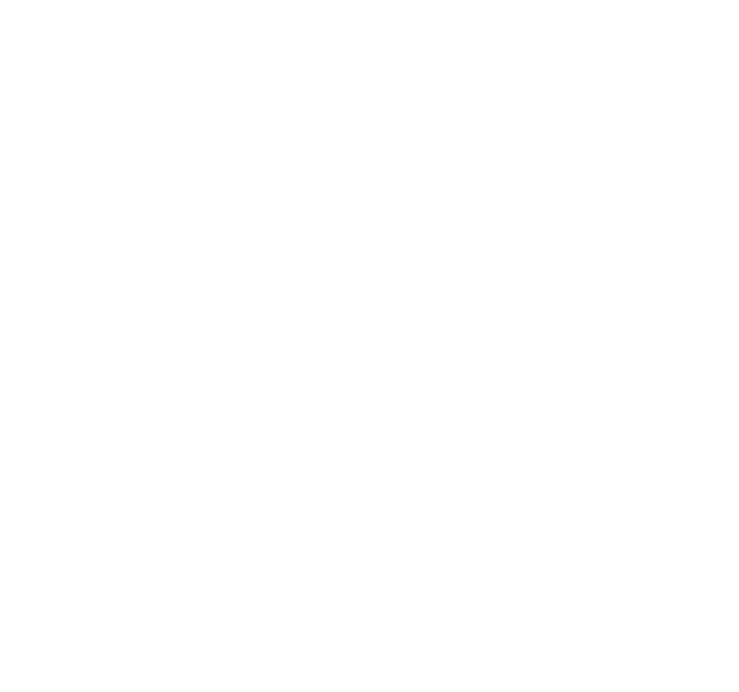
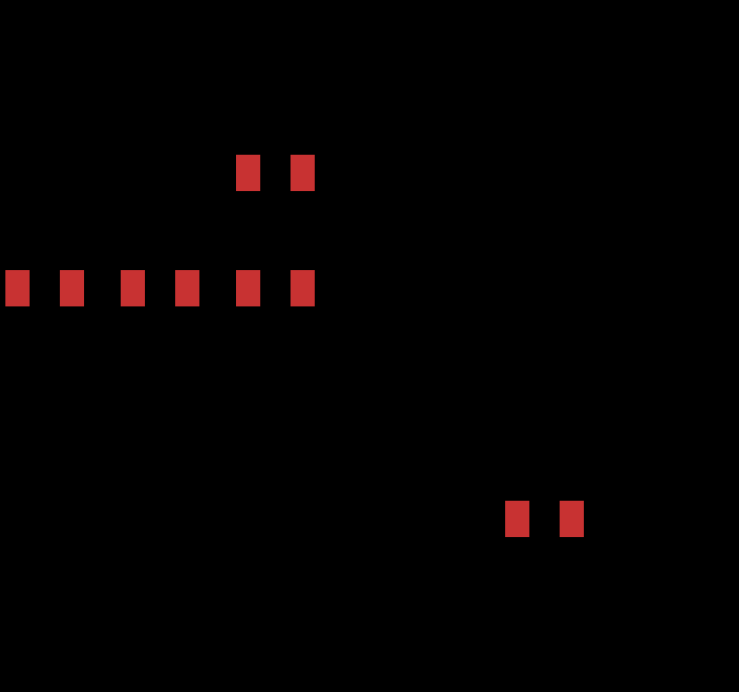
part: none -> (275, 172)
part: none -> (44, 288)
part: none -> (160, 288)
part: none -> (275, 288)
part: none -> (544, 518)

